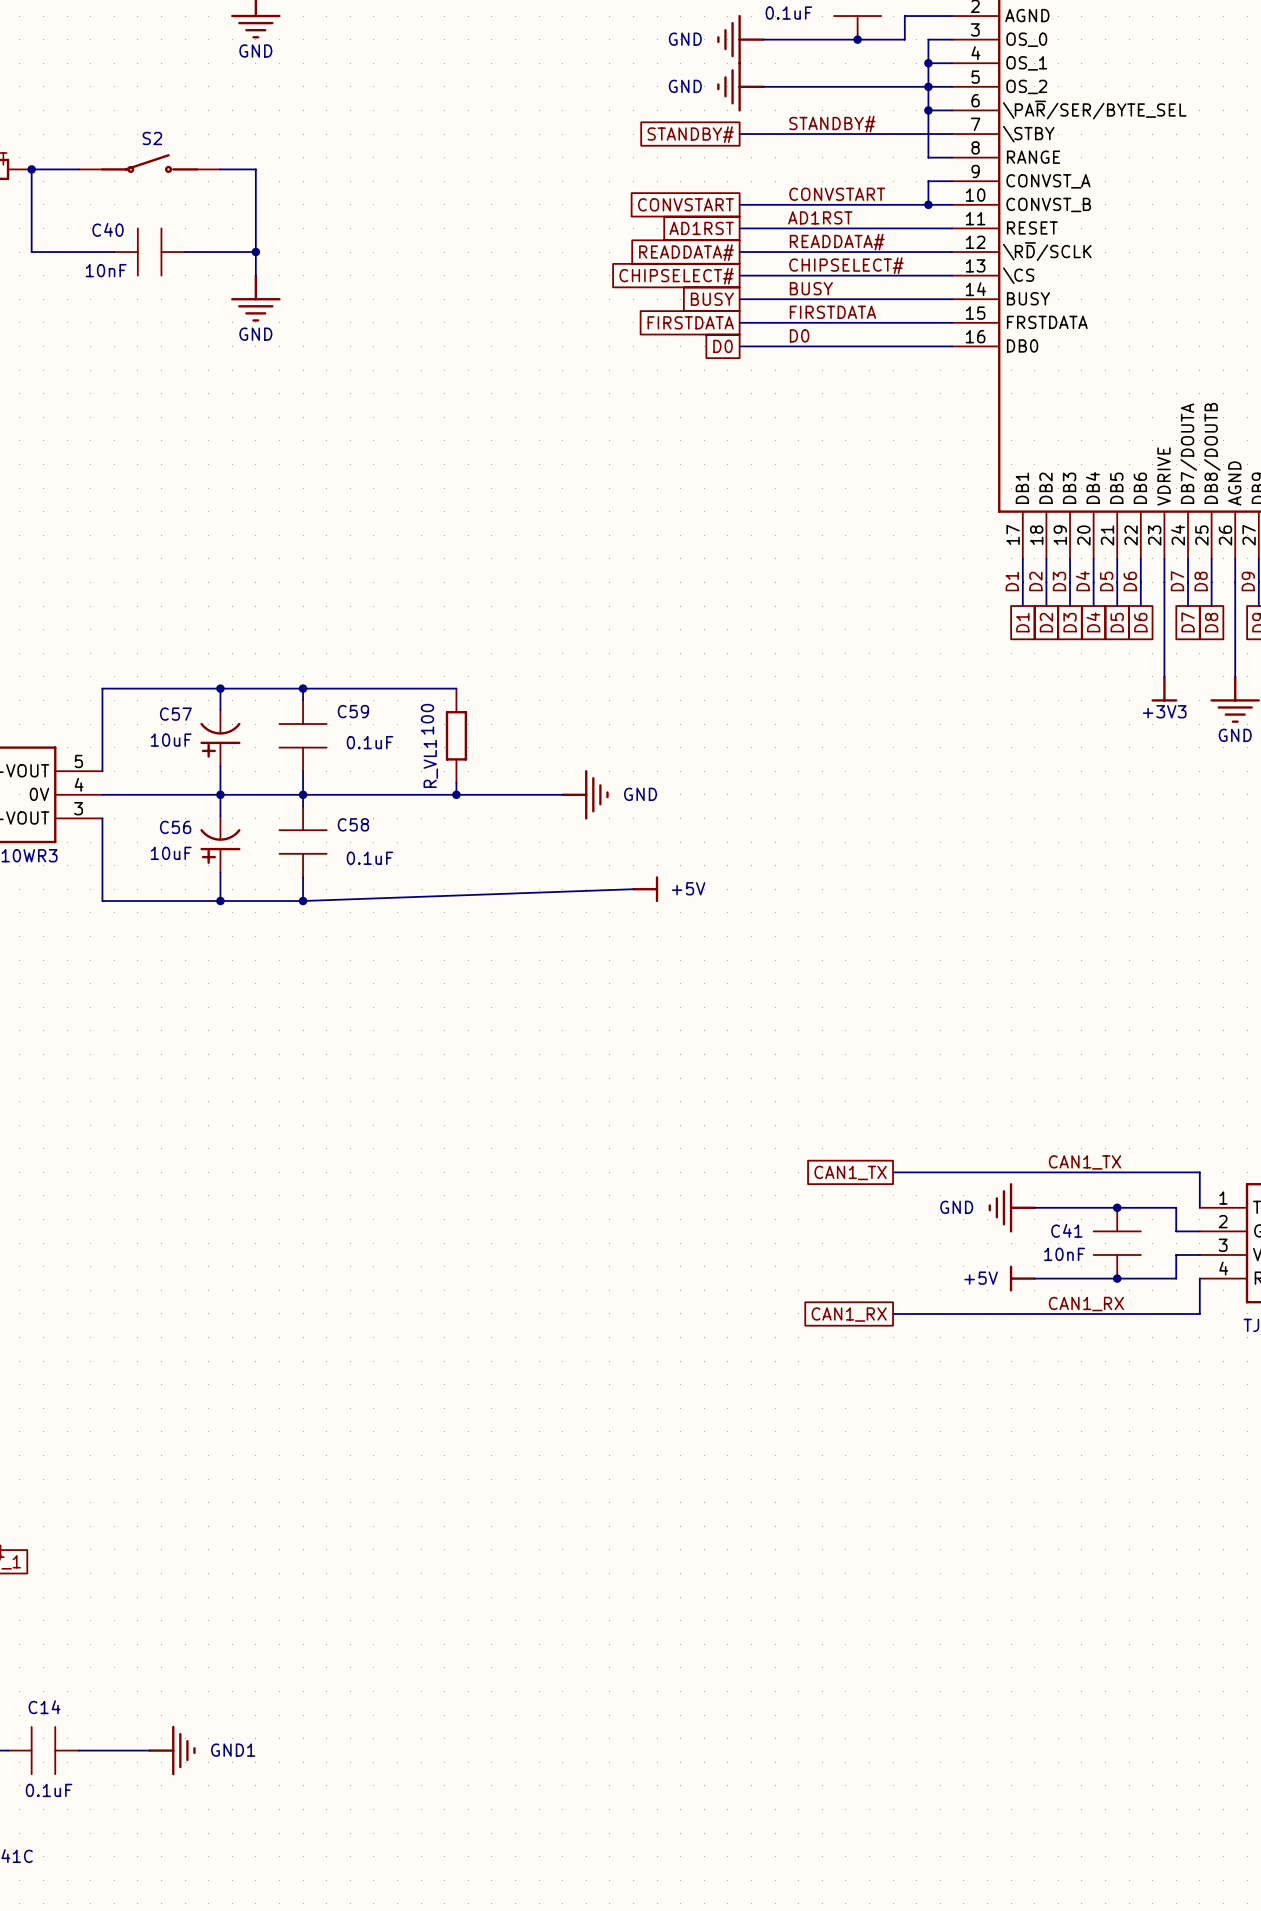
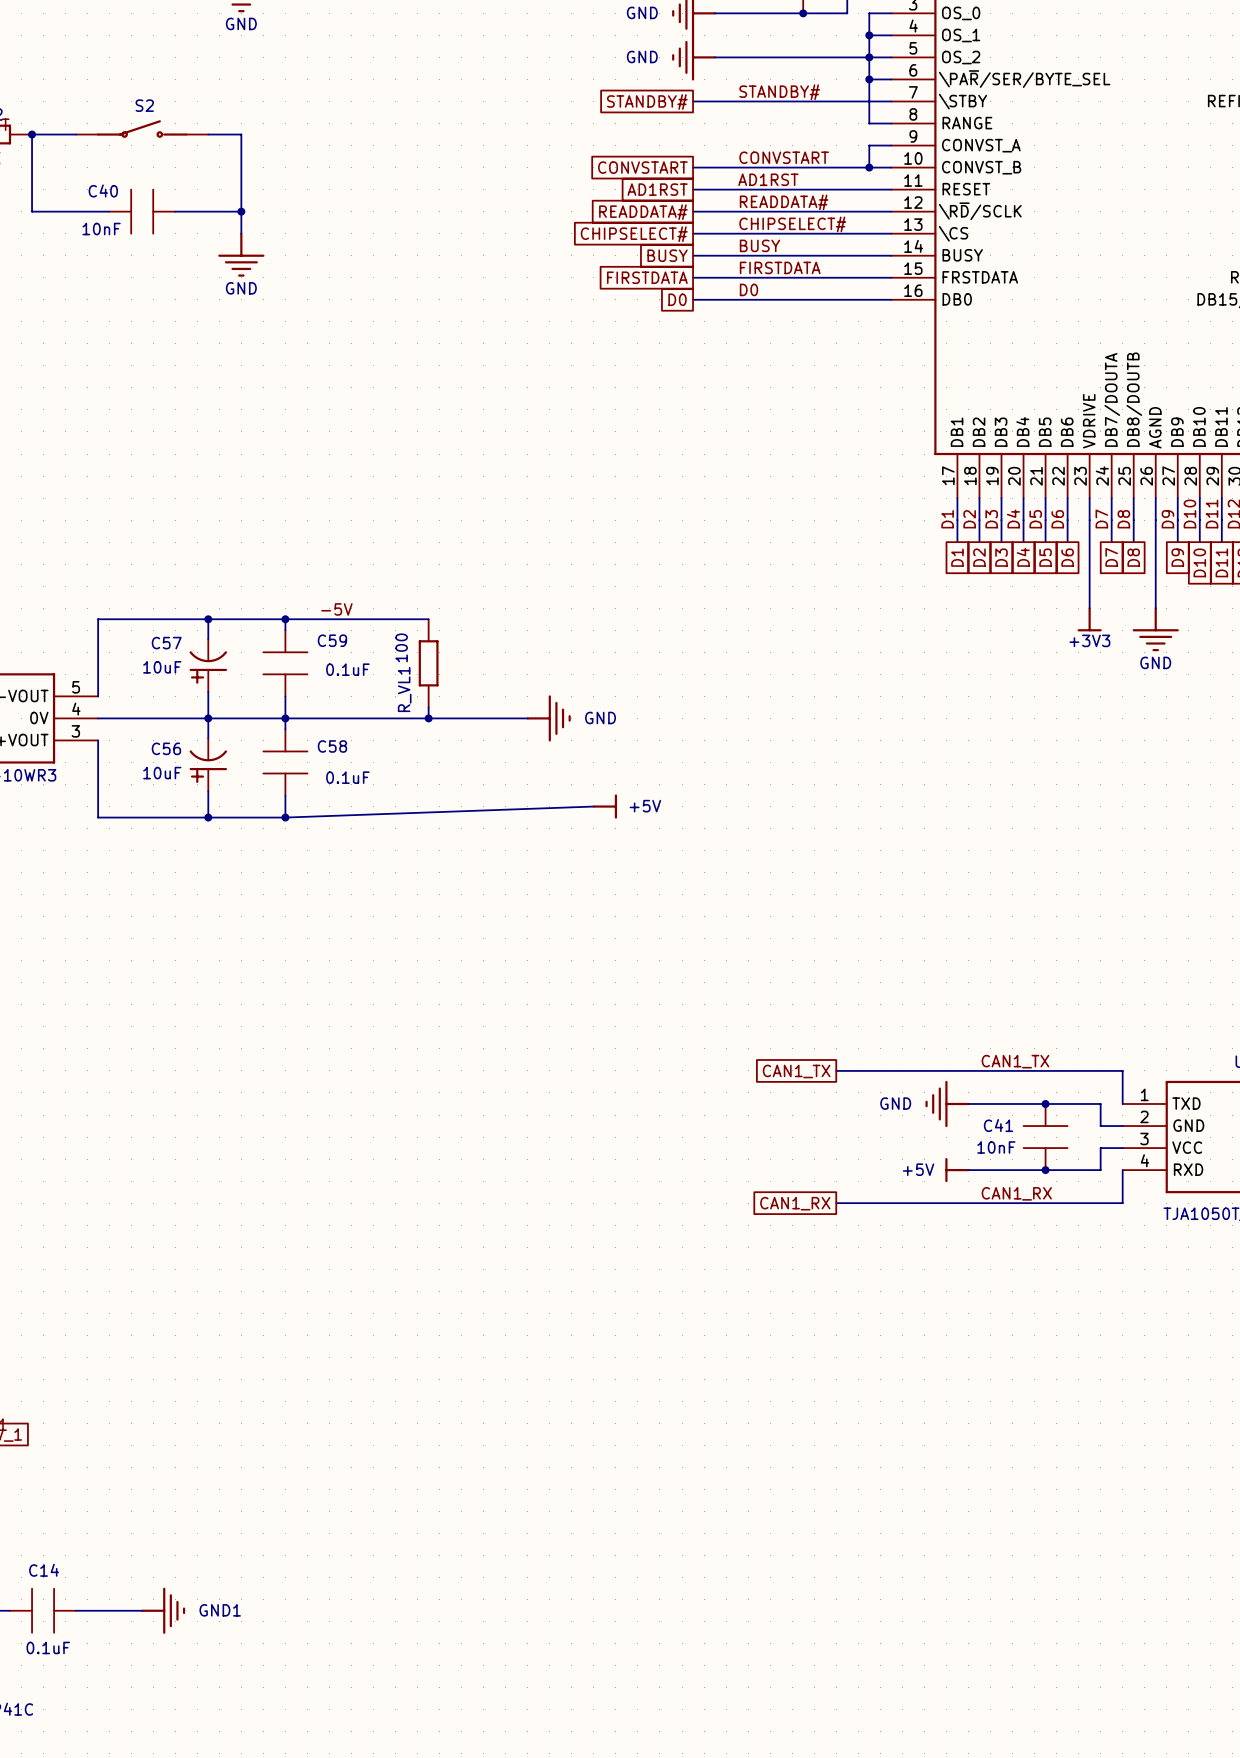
label: none -> -5V (336, 609)

